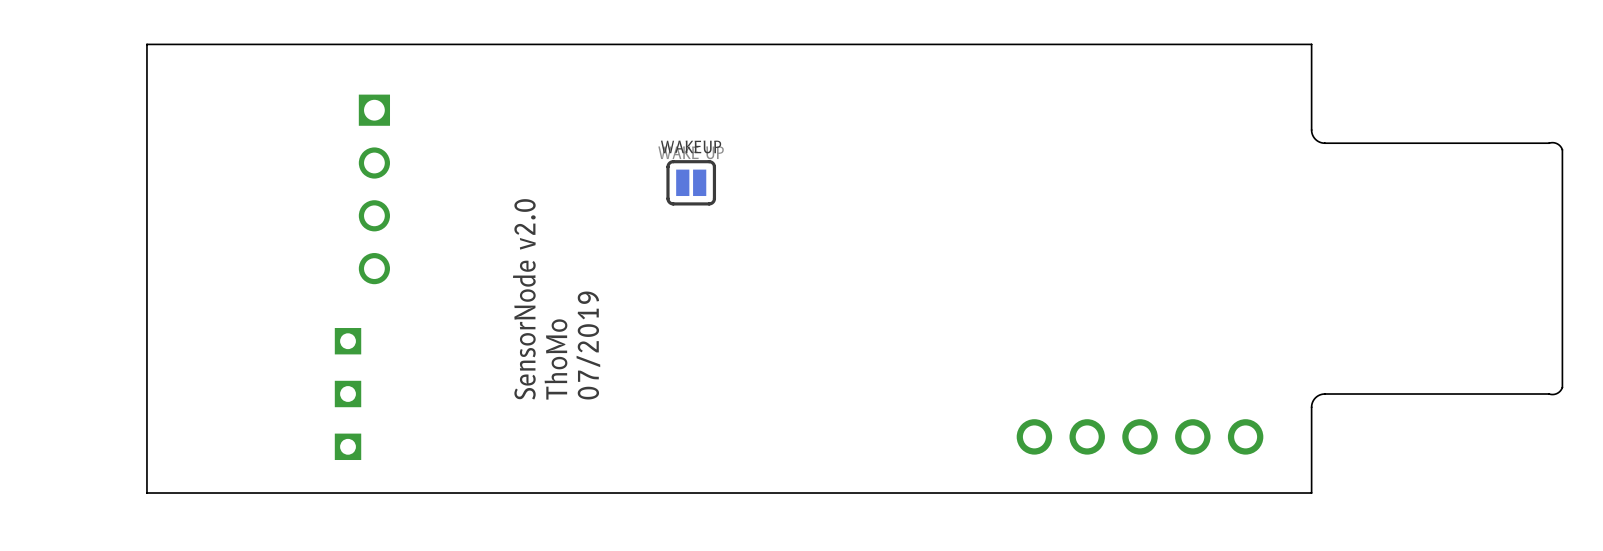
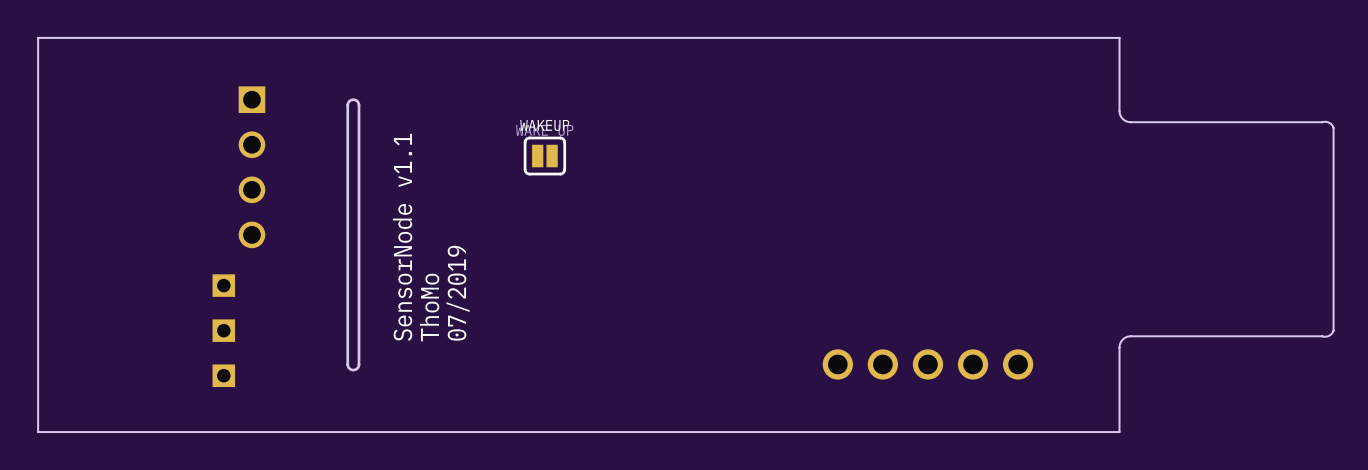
board edge: (146, 44) (146, 493) (1311, 493) -> (37, 432) (1119, 432) (1119, 420)
board edge: none -> (125, 37) (38, 37) (38, 432)
board edge: none -> (359, 105) (359, 364) (357, 368) (353, 370) (349, 368) (347, 364) (347, 105) (349, 101) (353, 99) (357, 101) (359, 105)
WAKEUP position: (691, 182) -> (544, 156)
part position: (374, 189) -> (251, 167)
text: none -> SensorNode v1.1 (402, 237)
text: SensorNode v2.0 (524, 299) -> none
text position: 07/2019 (588, 345) -> 07/2019 (458, 293)
text position: ThoMo (555, 359) -> ThoMo (429, 307)
part position: (348, 394) -> (223, 330)
part position: (1140, 436) -> (927, 364)

